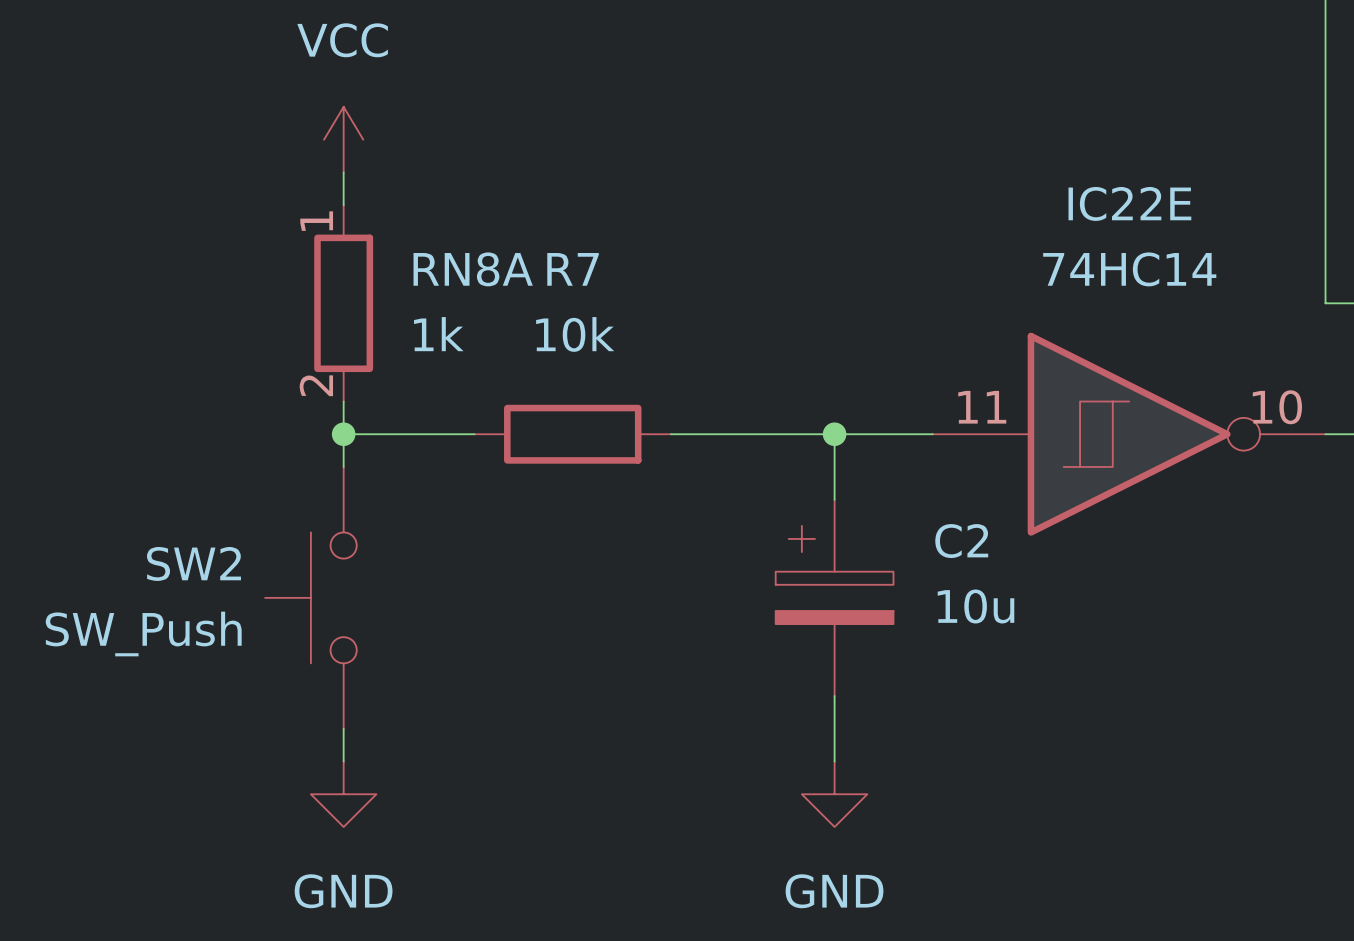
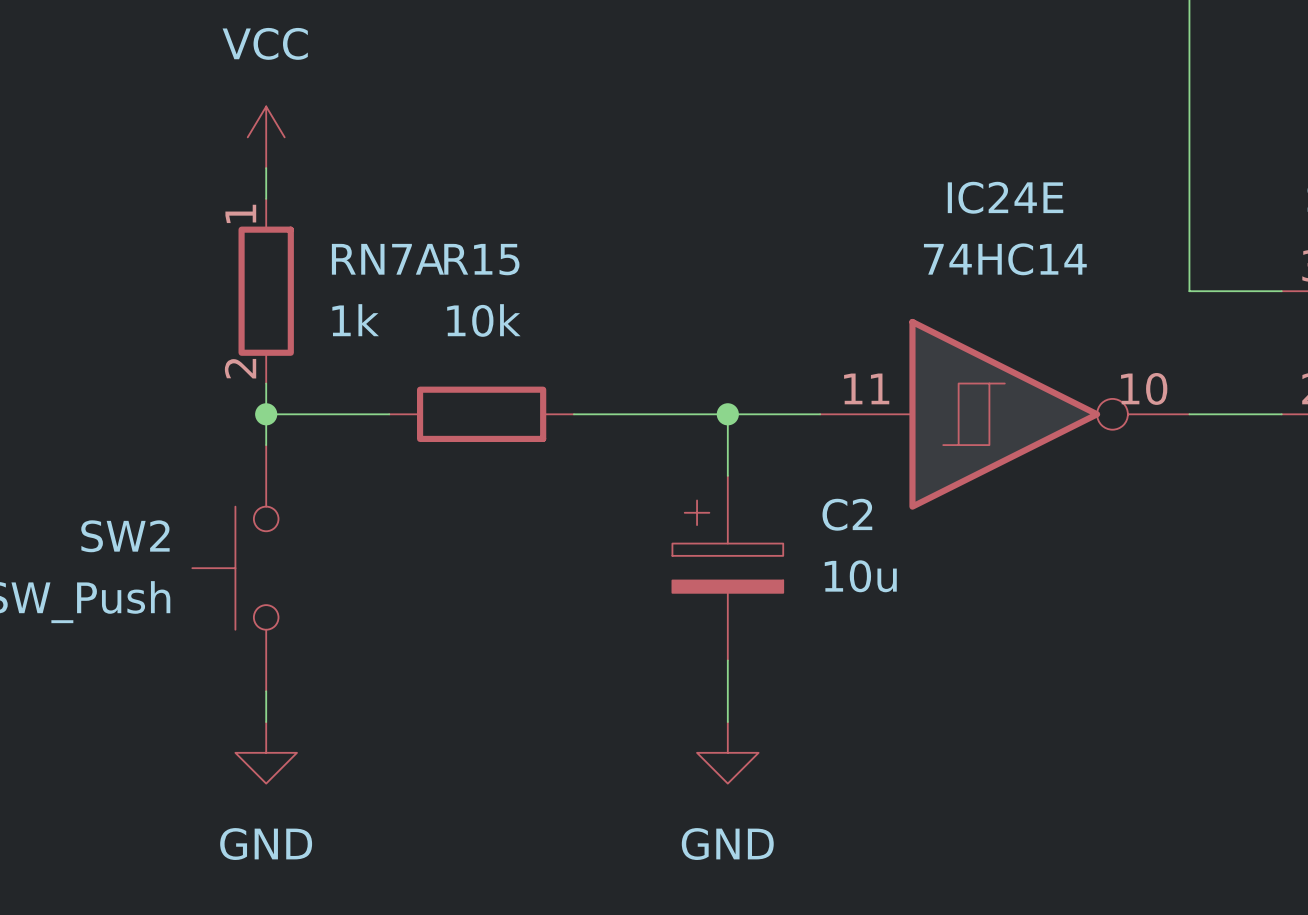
IC22E name: IC22E (1129, 203) -> IC24E (1005, 197)
RN8A name: RN8A (473, 269) -> RN7A (387, 259)
R7 name: R7 (573, 269) -> R15 (481, 259)

